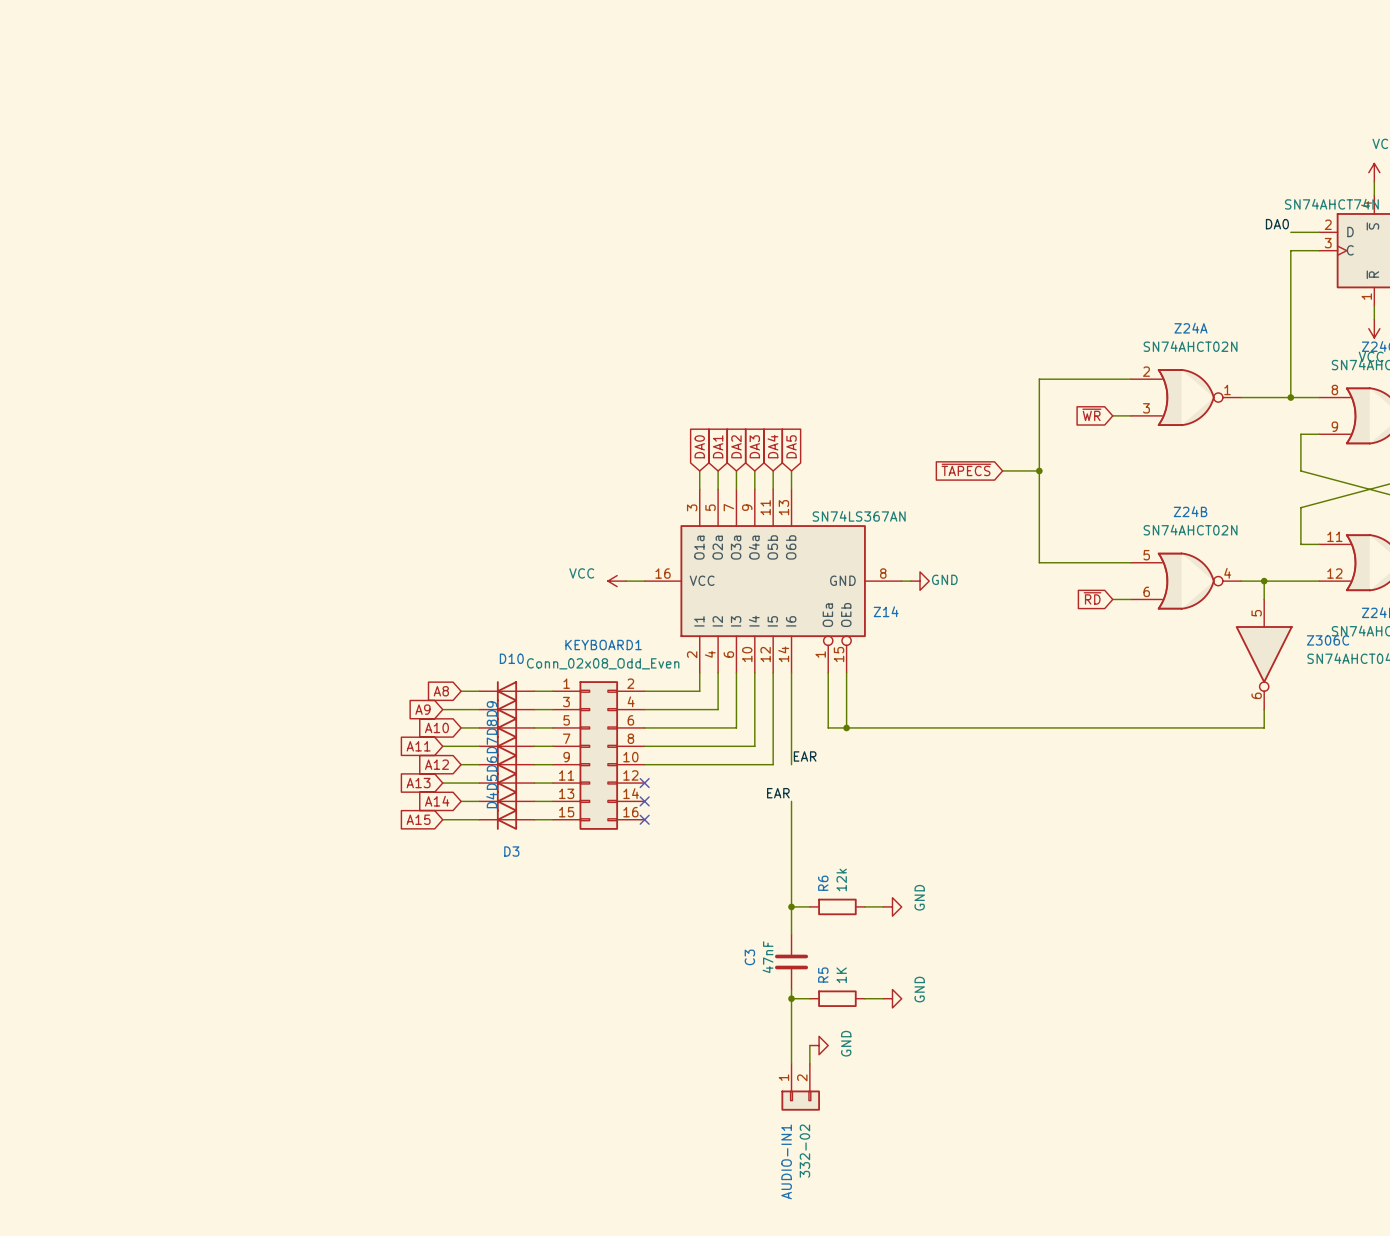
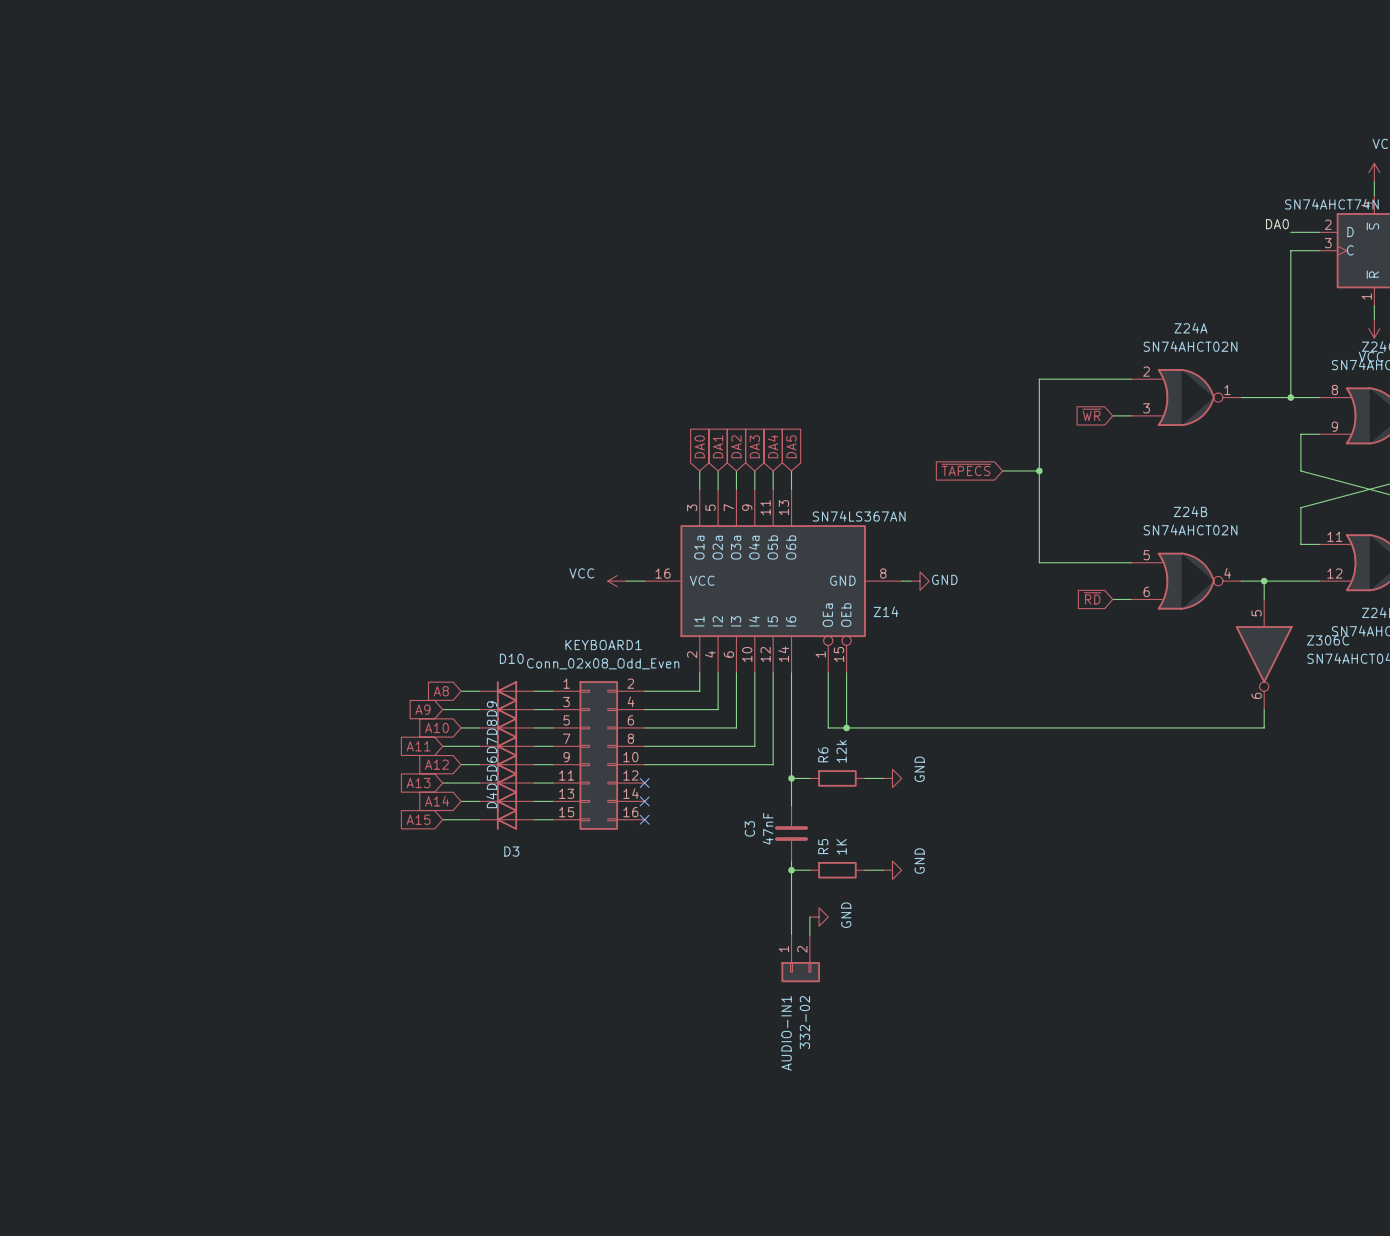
label: EAR (805, 756) -> none
wire: none -> (791, 764) (791, 801)
junction: none -> (791, 778)
power symbol: none -> GND (892, 778)
label: EAR (778, 793) -> none
wire: (791, 906) (809, 906) -> (791, 778) (809, 778)
junction position: (791, 906) -> (791, 870)
R6 position: (837, 906) -> (837, 778)
wire: (864, 906) (883, 906) -> (864, 778) (883, 778)
power symbol position: GND (892, 906) -> GND (892, 870)
power symbol: none -> GND (819, 917)
C3 position: (791, 962) -> (791, 833)
wire: (791, 989) (791, 1063) -> none
wire: (791, 998) (809, 998) -> (791, 870) (809, 870)
junction: (791, 998) -> none
R5 position: (837, 998) -> (837, 870)
wire: (864, 998) (883, 998) -> (864, 870) (883, 870)
power symbol: GND (892, 998) -> none
wire: (809, 1045) (809, 1063) -> (809, 917) (809, 935)
power symbol: GND (819, 1045) -> none
AUDIO-IN1 position: (800, 1087) -> (800, 958)

